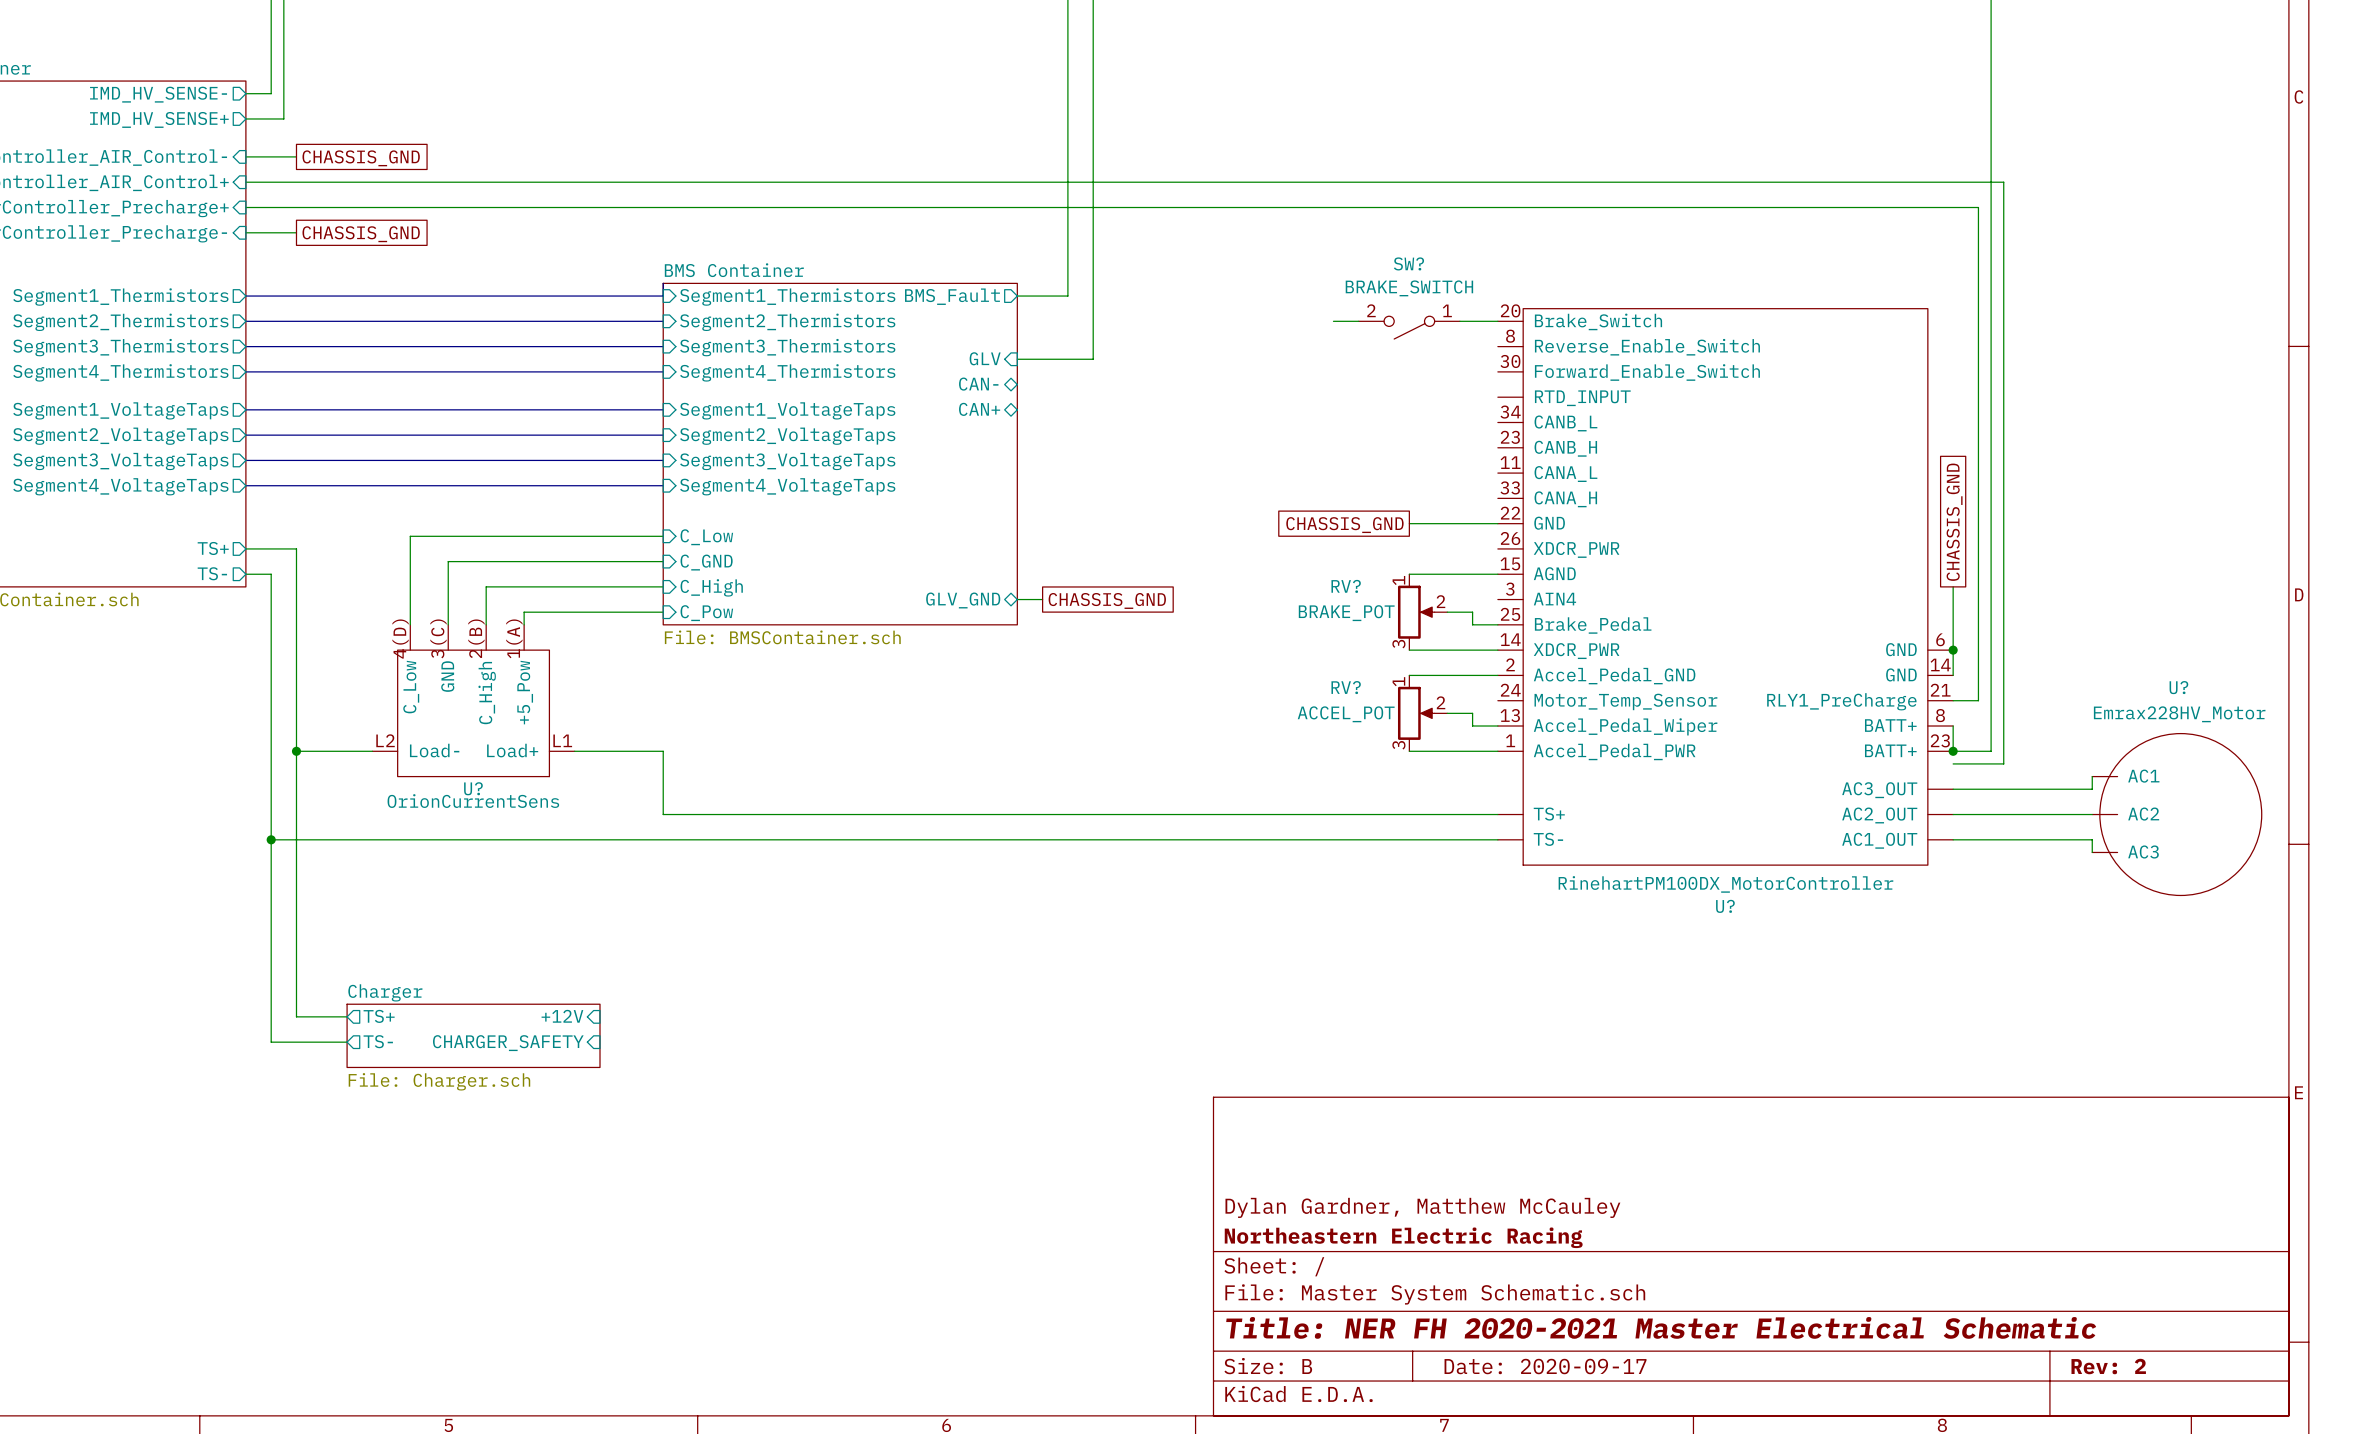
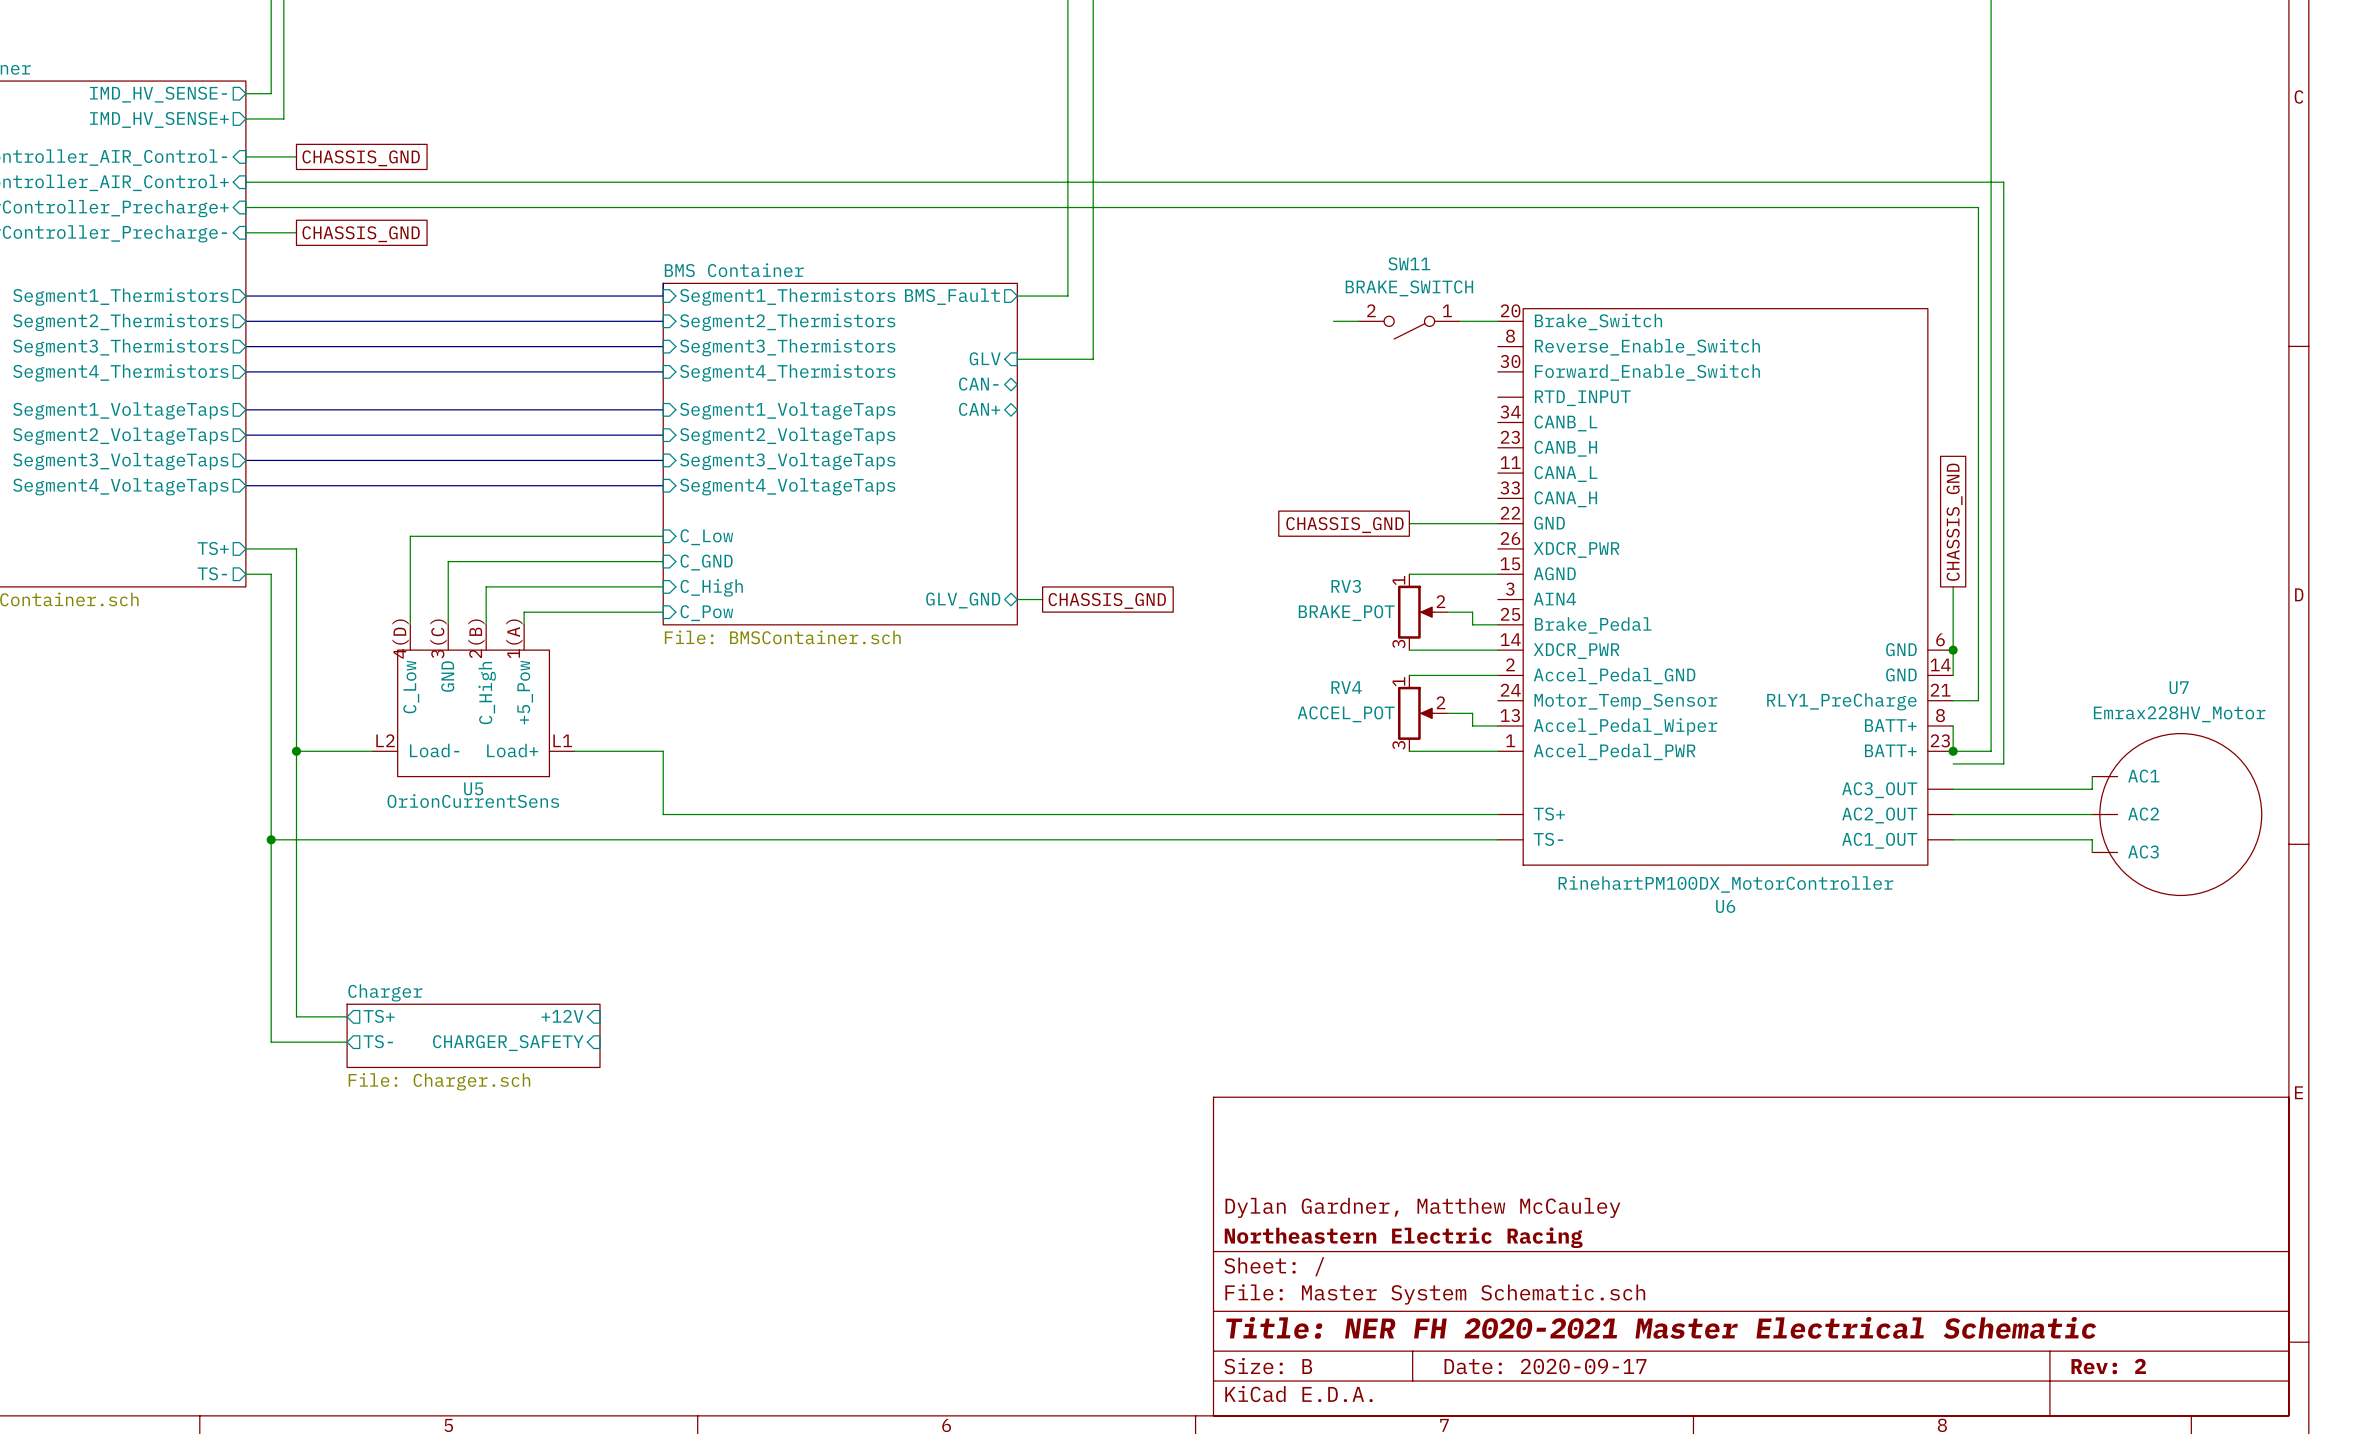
SW? name: SW? (1408, 263) -> SW11 (1409, 263)
RV? name: RV? (1346, 586) -> RV3 (1346, 586)
RV? name: RV? (1346, 687) -> RV4 (1346, 687)
U? name: U? (2178, 687) -> U7 (2179, 687)
U? name: U? (473, 788) -> U5 (473, 788)
U? name: U? (1725, 906) -> U6 (1725, 906)

